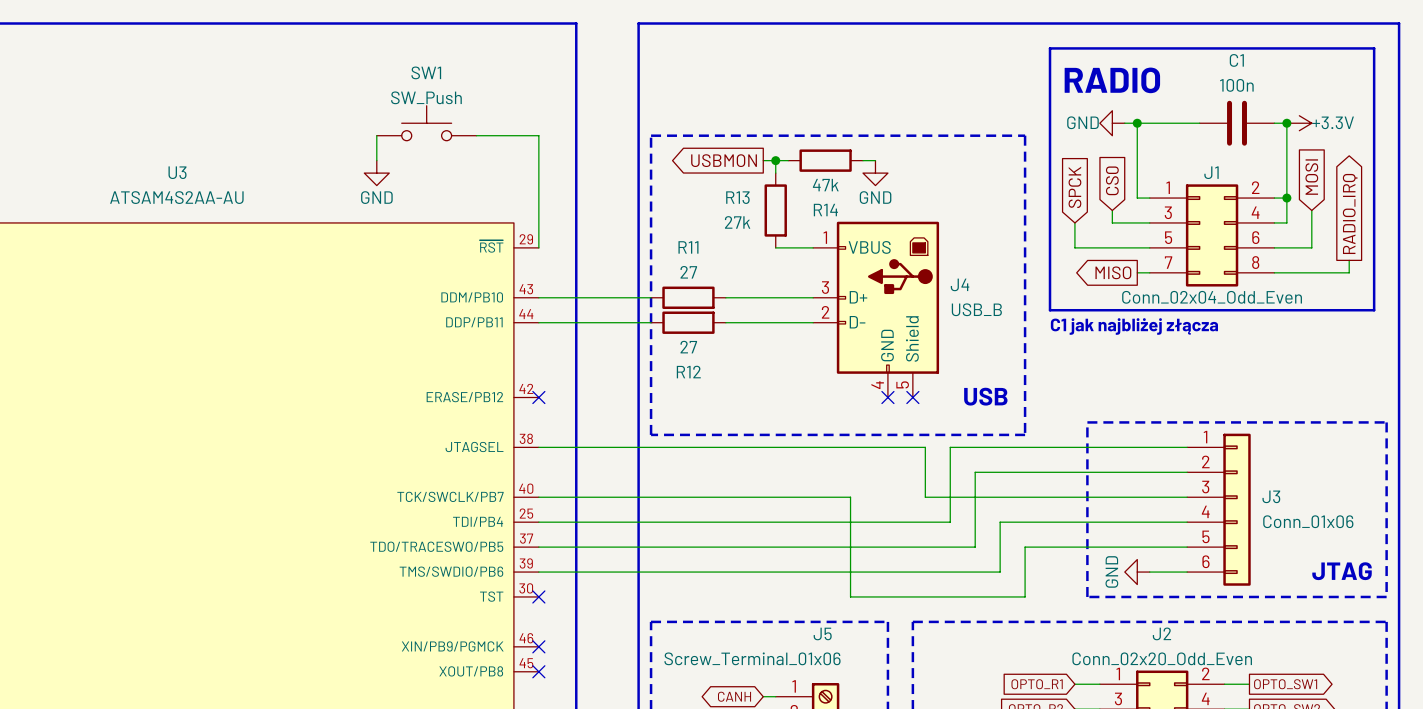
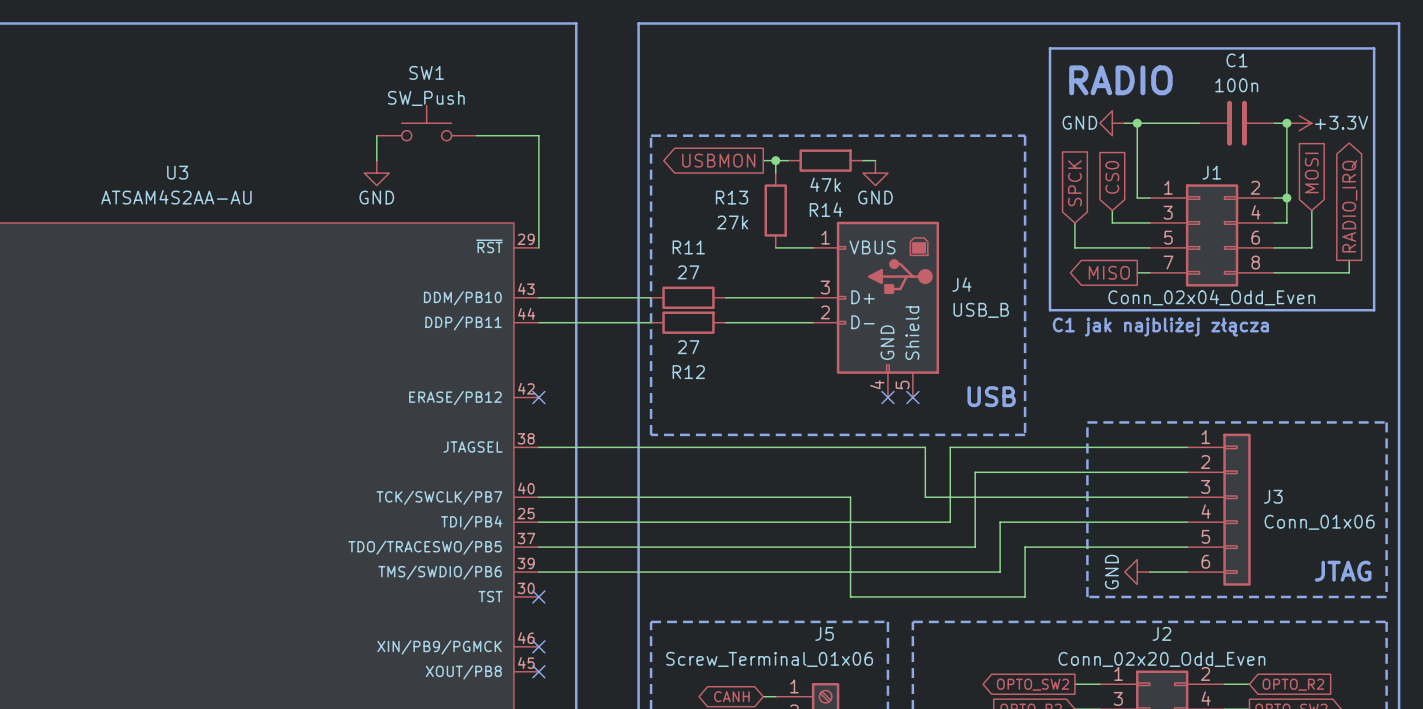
global label shape: input (1037, 684) -> output (1033, 684)
global label: OPTO_R1 (1037, 684) -> OPTO_SW2 (1033, 684)
global label shape: output (1285, 684) -> input (1293, 684)
global label: OPTO_SW1 (1285, 684) -> OPTO_R2 (1293, 684)

